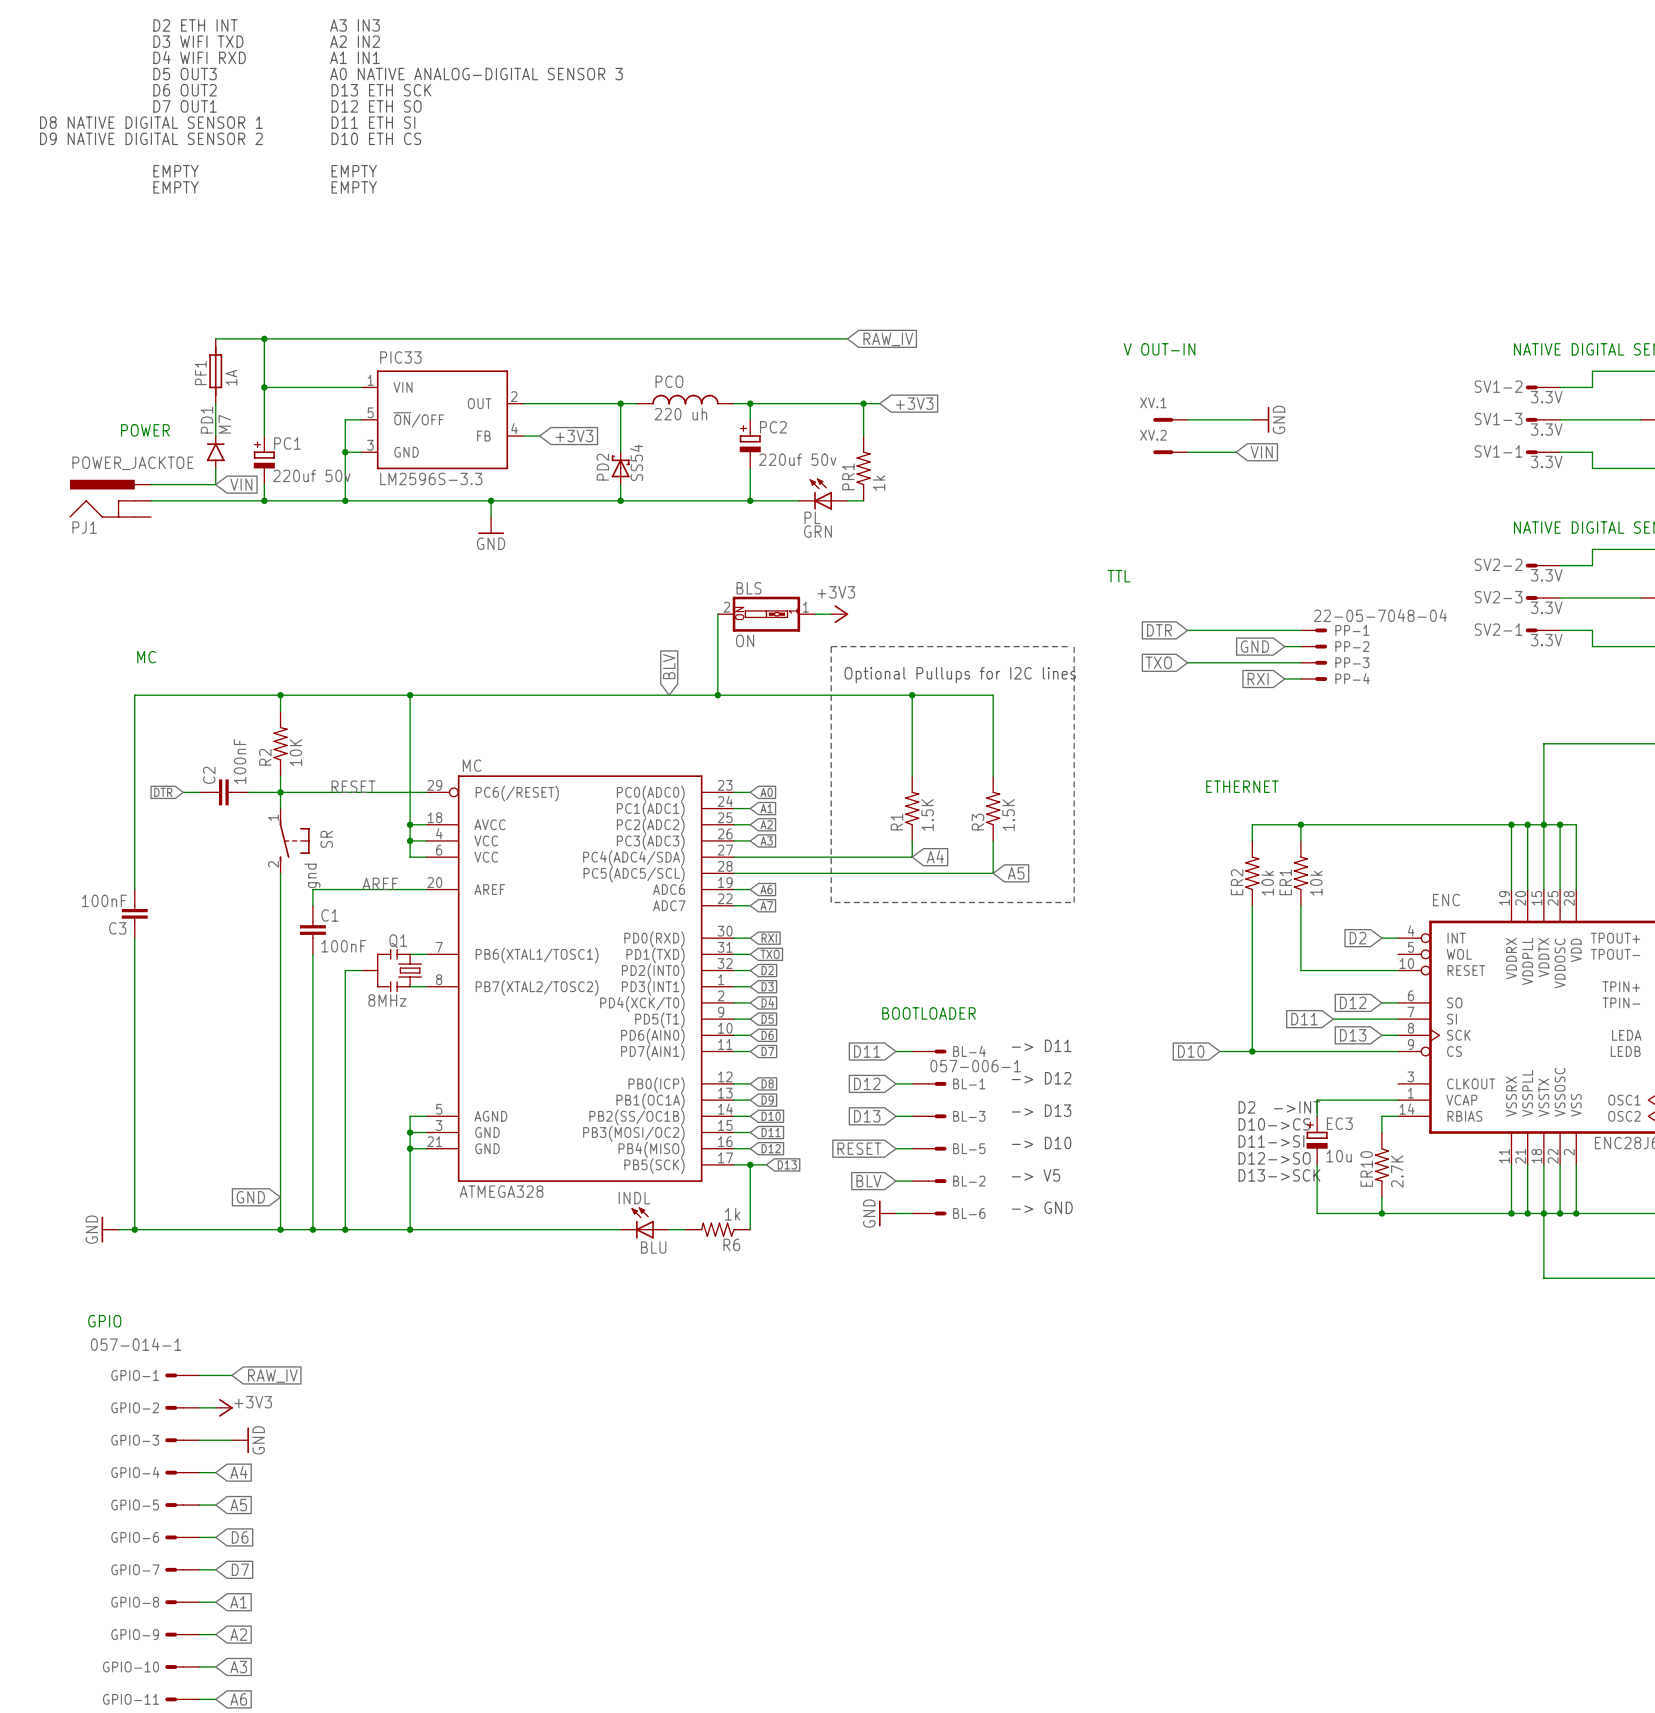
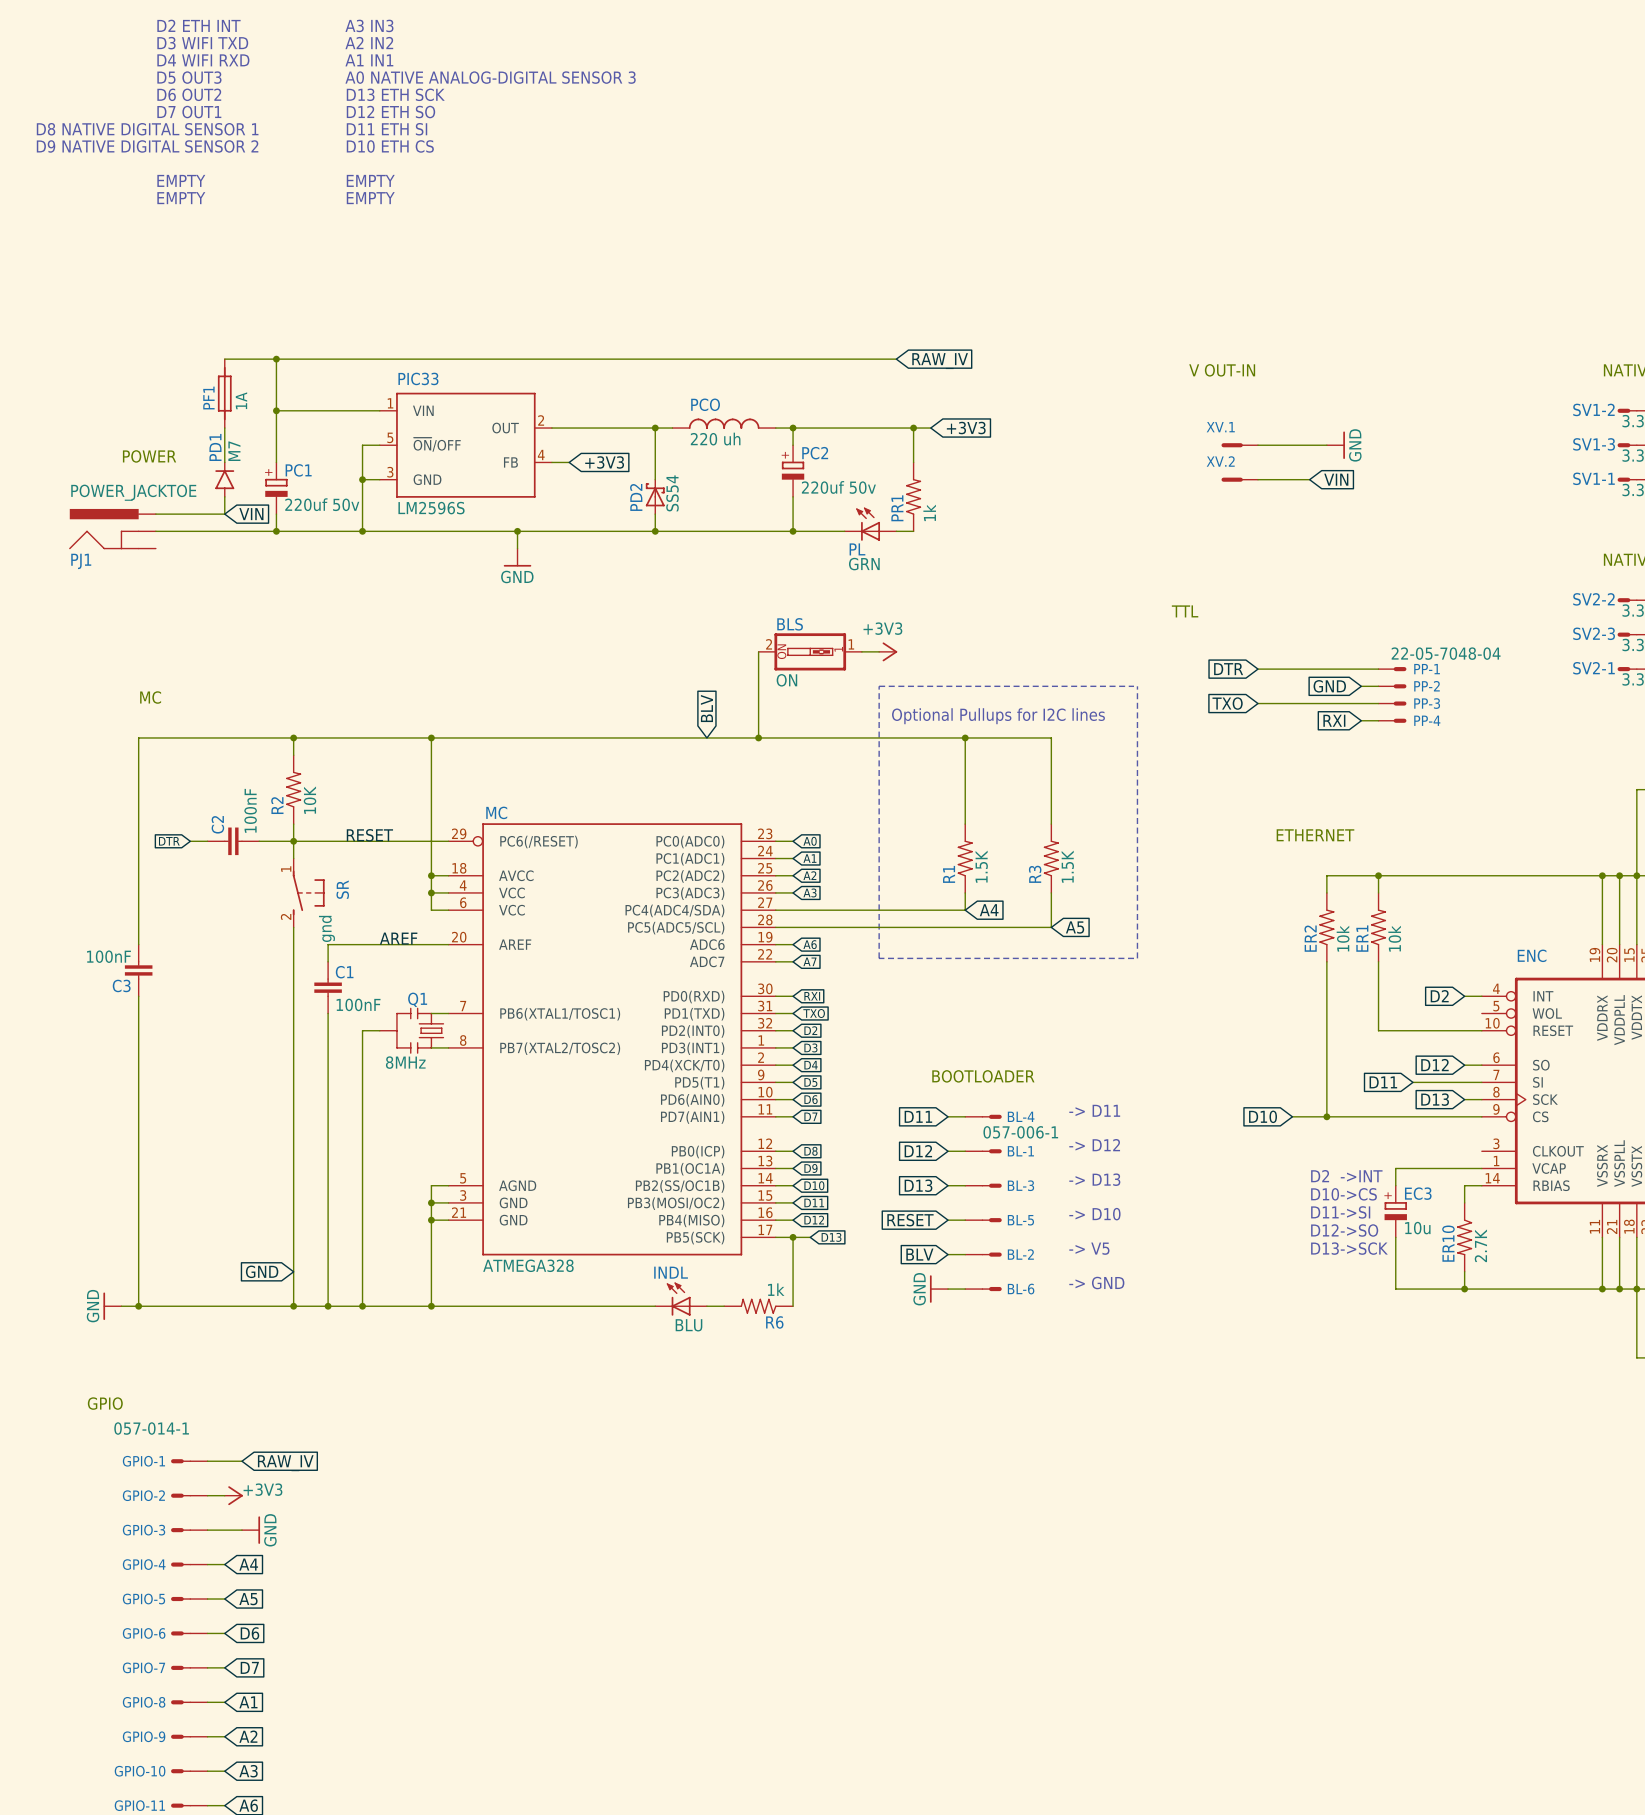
PIC33 value: LM2596S-3.3 (431, 478) -> LM2596S (431, 508)

